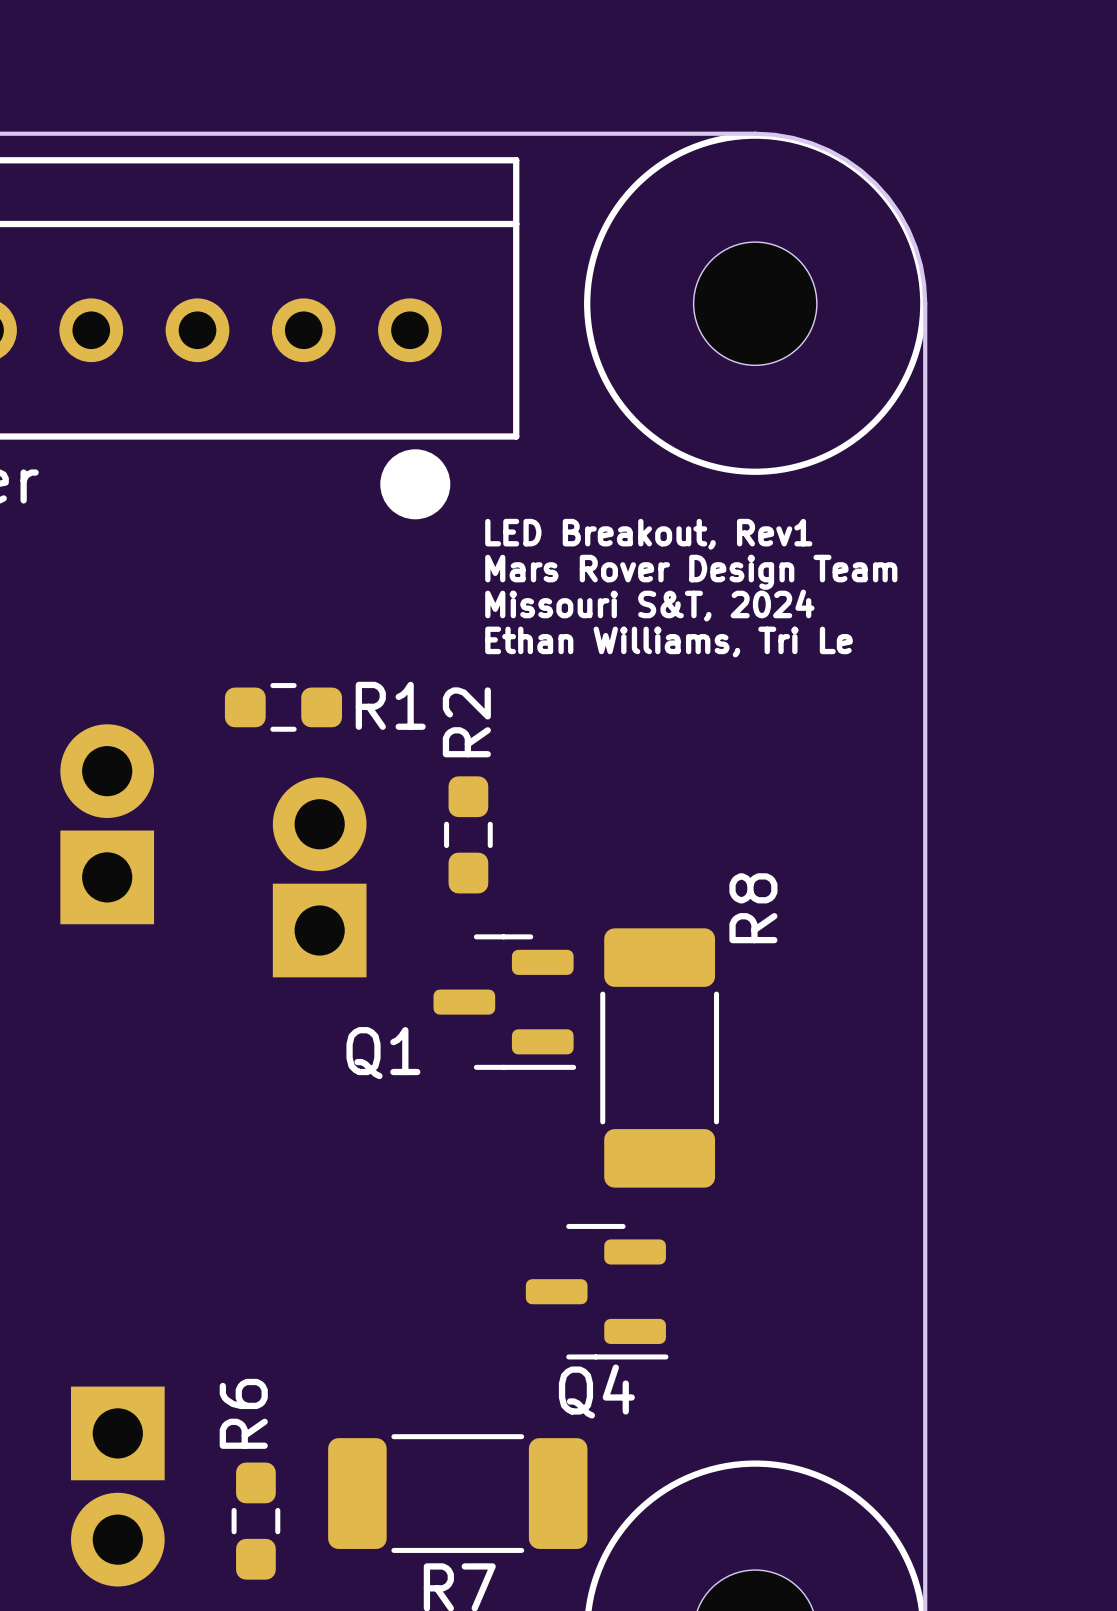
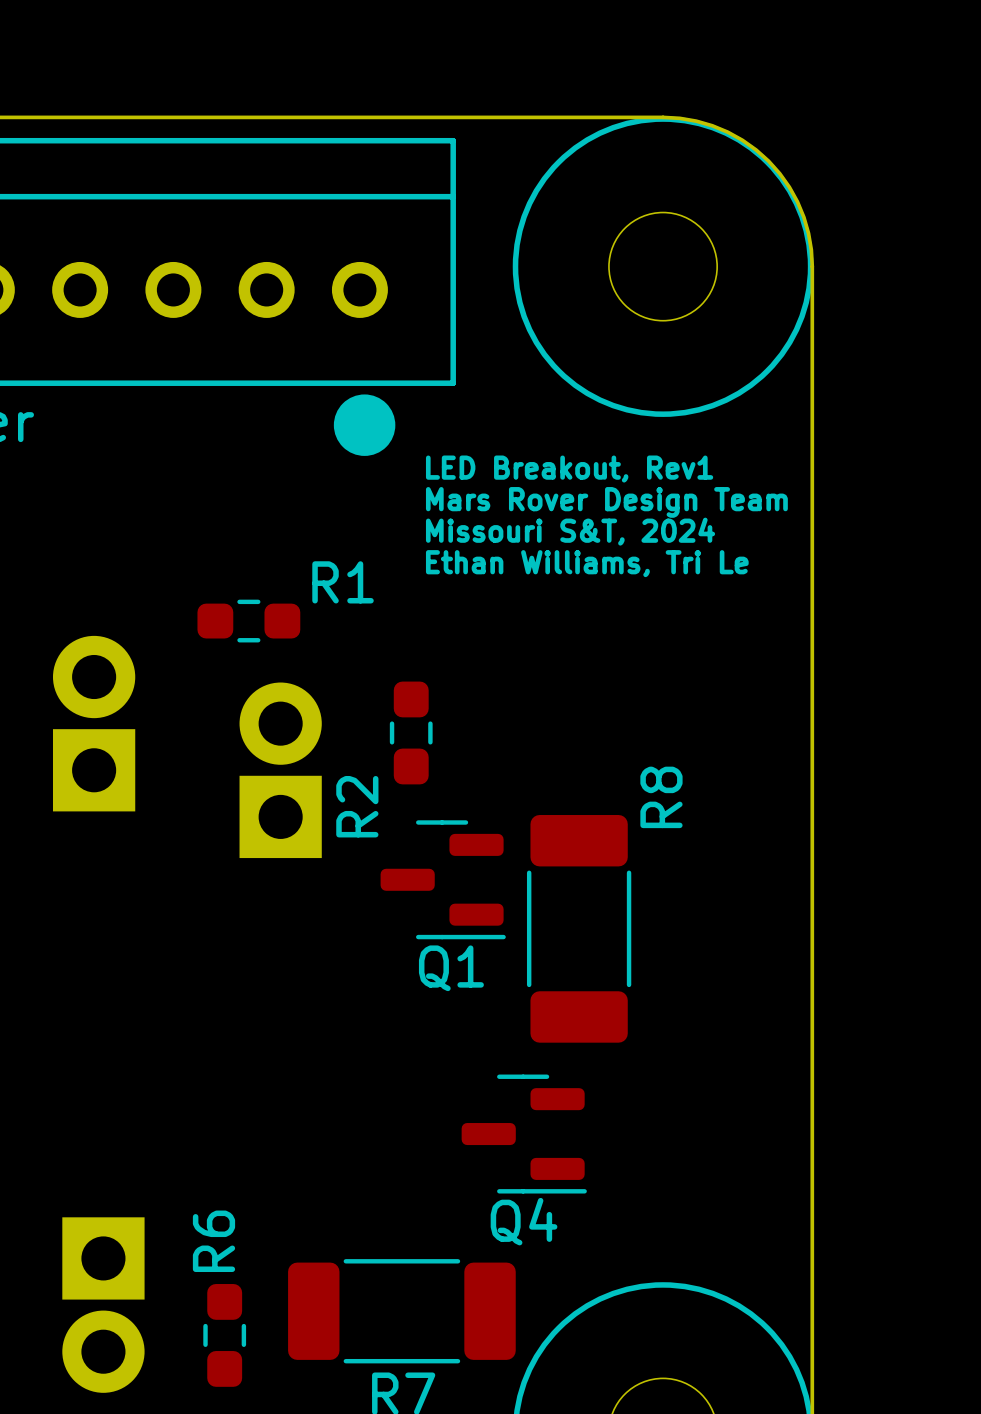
R1 name position: R1 (390, 705) -> R1 (343, 582)
R2 name position: R2 (466, 722) -> R2 (357, 806)
Q1 name position: Q1 (383, 1053) -> Q1 (451, 968)

